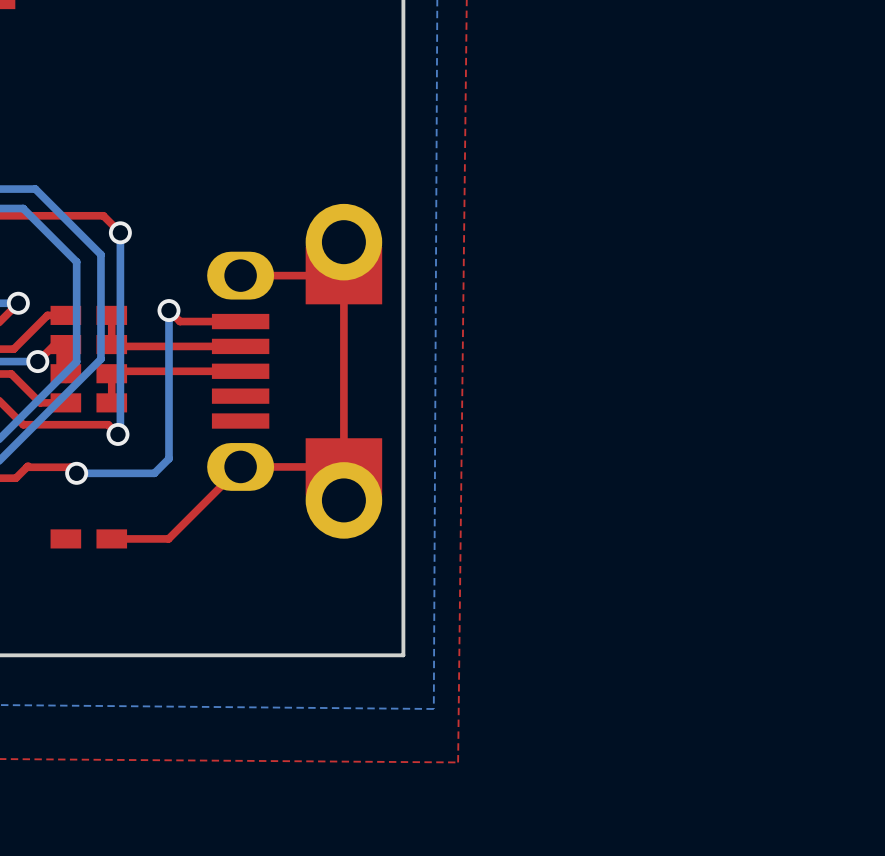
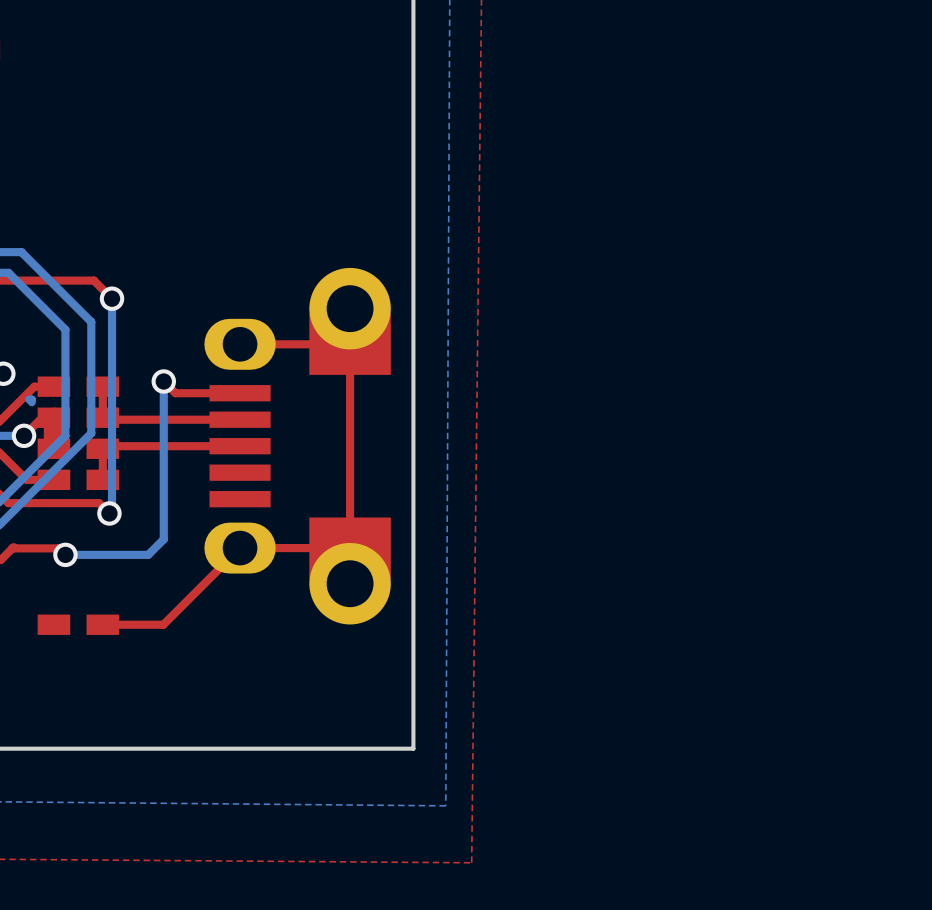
bottom track: none -> (29, 399) (31, 399) (31, 402)

